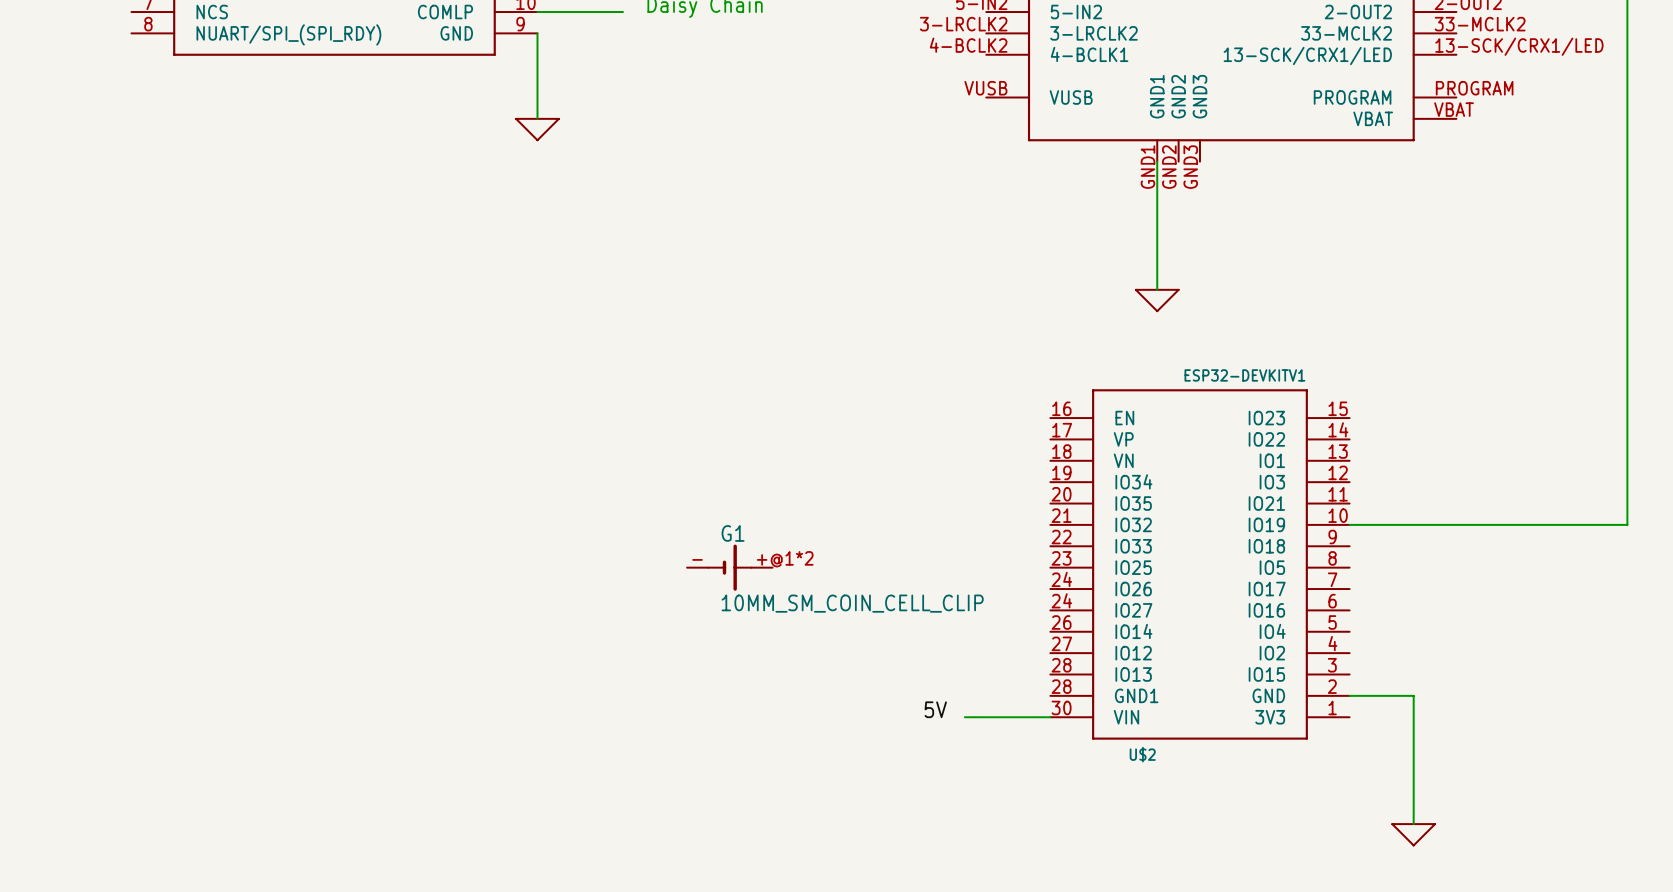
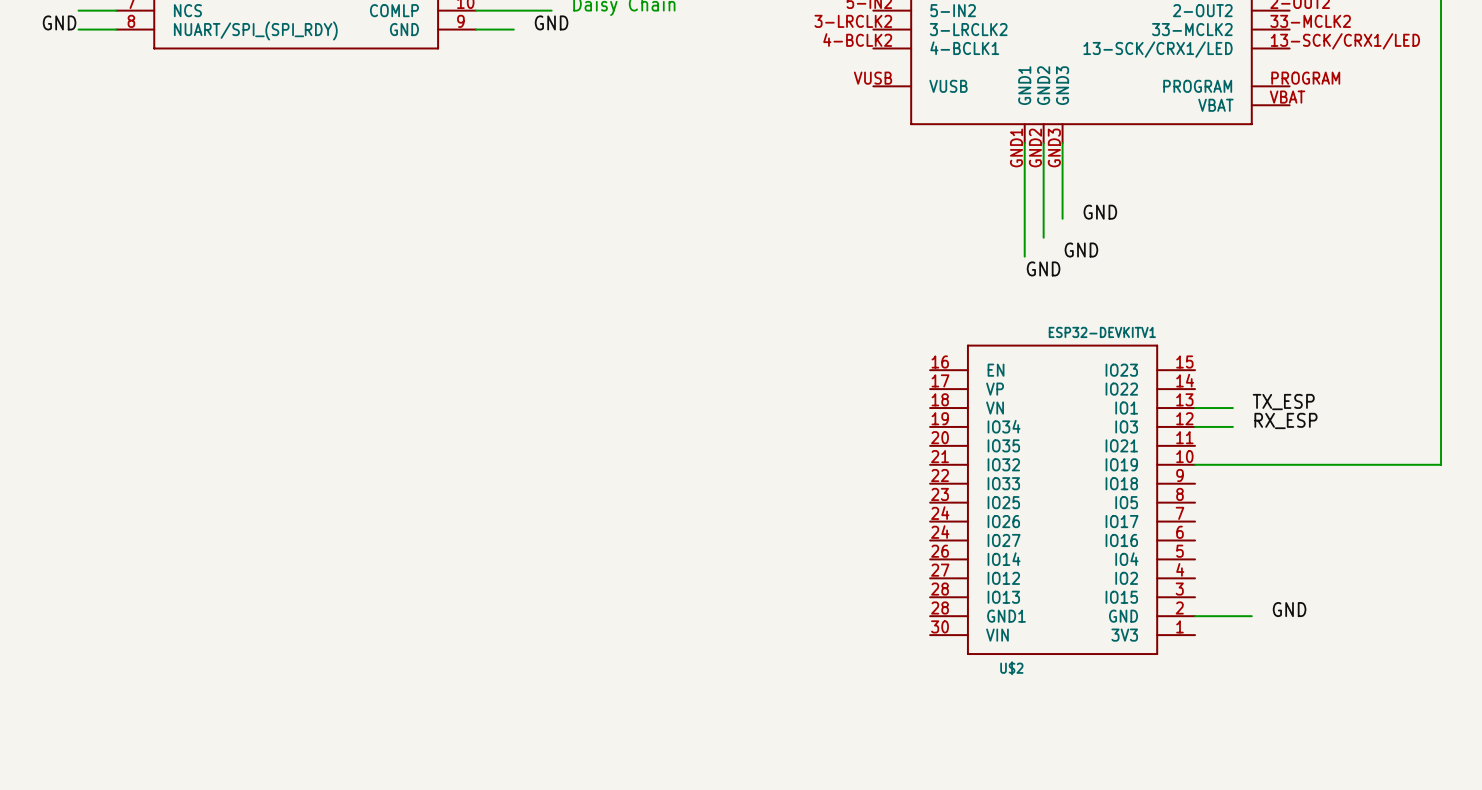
wire: none -> (78, 10) (116, 10)
label: none -> GND (59, 22)
label: none -> GND (551, 22)
wire: none -> (78, 29) (116, 29)
wire: (537, 33) (537, 118) -> (475, 29) (513, 29)
power symbol: (537, 129) -> none
wire: none -> (1043, 143) (1043, 237)
wire: none -> (1062, 143) (1062, 218)
label: none -> GND (1100, 212)
label: none -> GND (1081, 250)
power symbol: (1157, 300) -> none
label: none -> GND (1043, 268)
label: none -> TX_ESP (1283, 402)
wire: none -> (1195, 408) (1232, 408)
label: none -> RX_ESP (1285, 420)
wire: none -> (1195, 426) (1232, 426)
G1: 10MM_SM_COIN_CELL_CLIP (729, 567) -> none
label: none -> GND (1289, 609)
wire: (1413, 695) (1413, 824) -> none
label: 5V (935, 709) -> none
wire: (964, 717) (1050, 717) -> none
power symbol: (1413, 834) -> none

